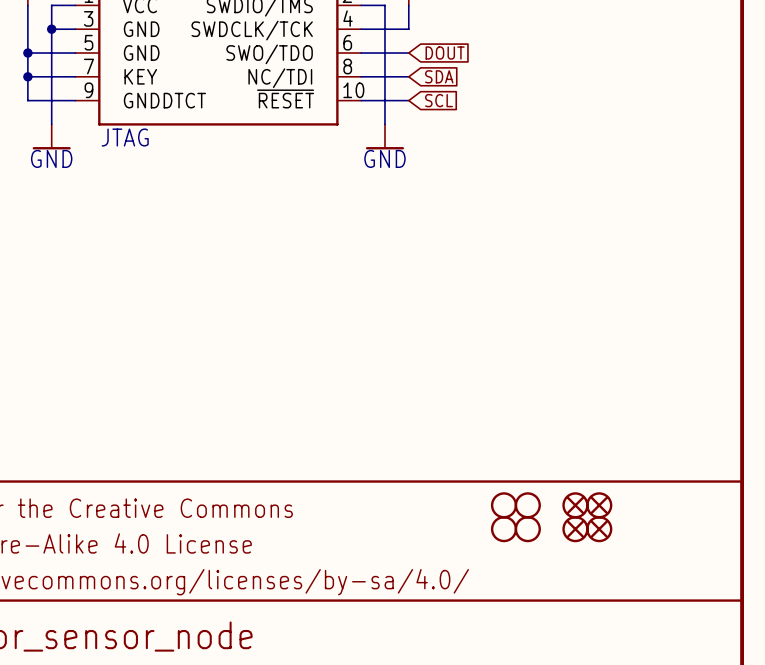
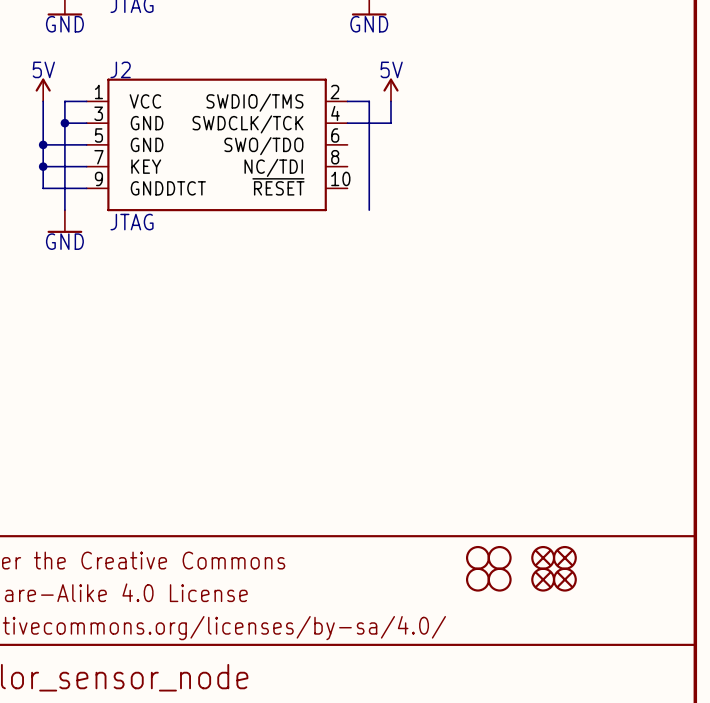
wire: (361, 53) (408, 53) -> none
global label: DOUT (445, 53) -> none
wire: (361, 76) (408, 76) -> none
global label: SDA (439, 76) -> none
wire: (361, 100) (408, 100) -> none
global label: SCL (439, 100) -> none
power symbol: GND (384, 136) -> none

